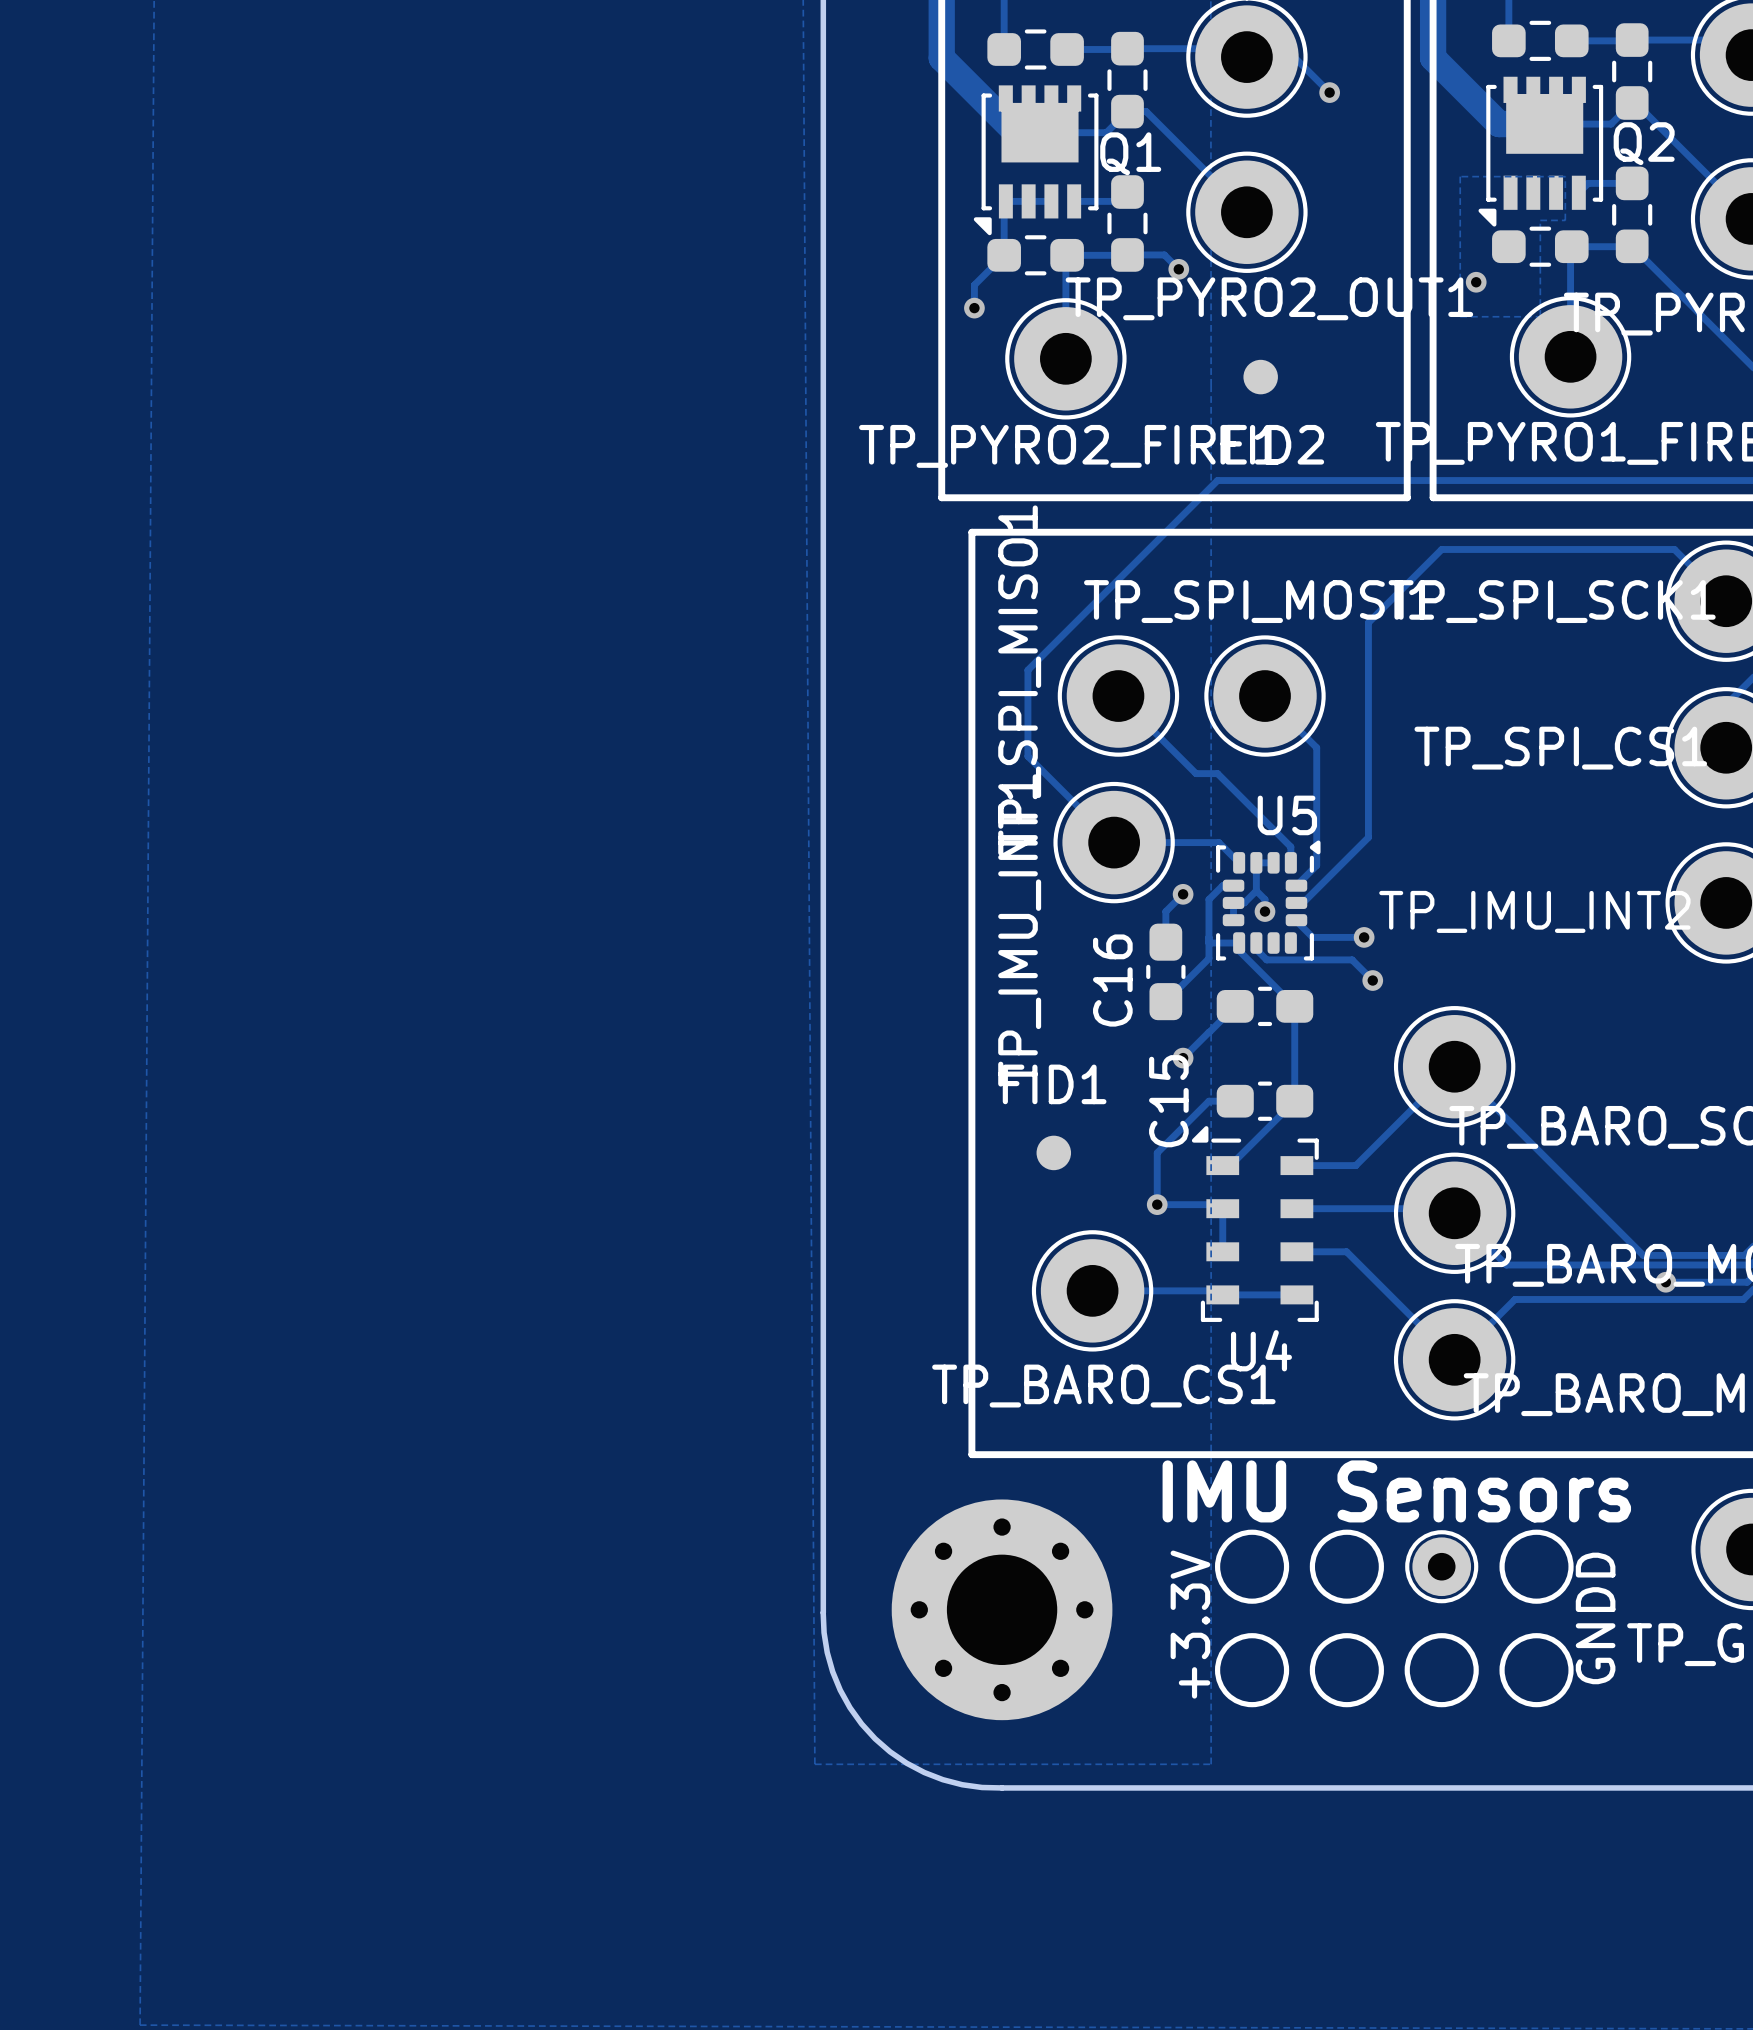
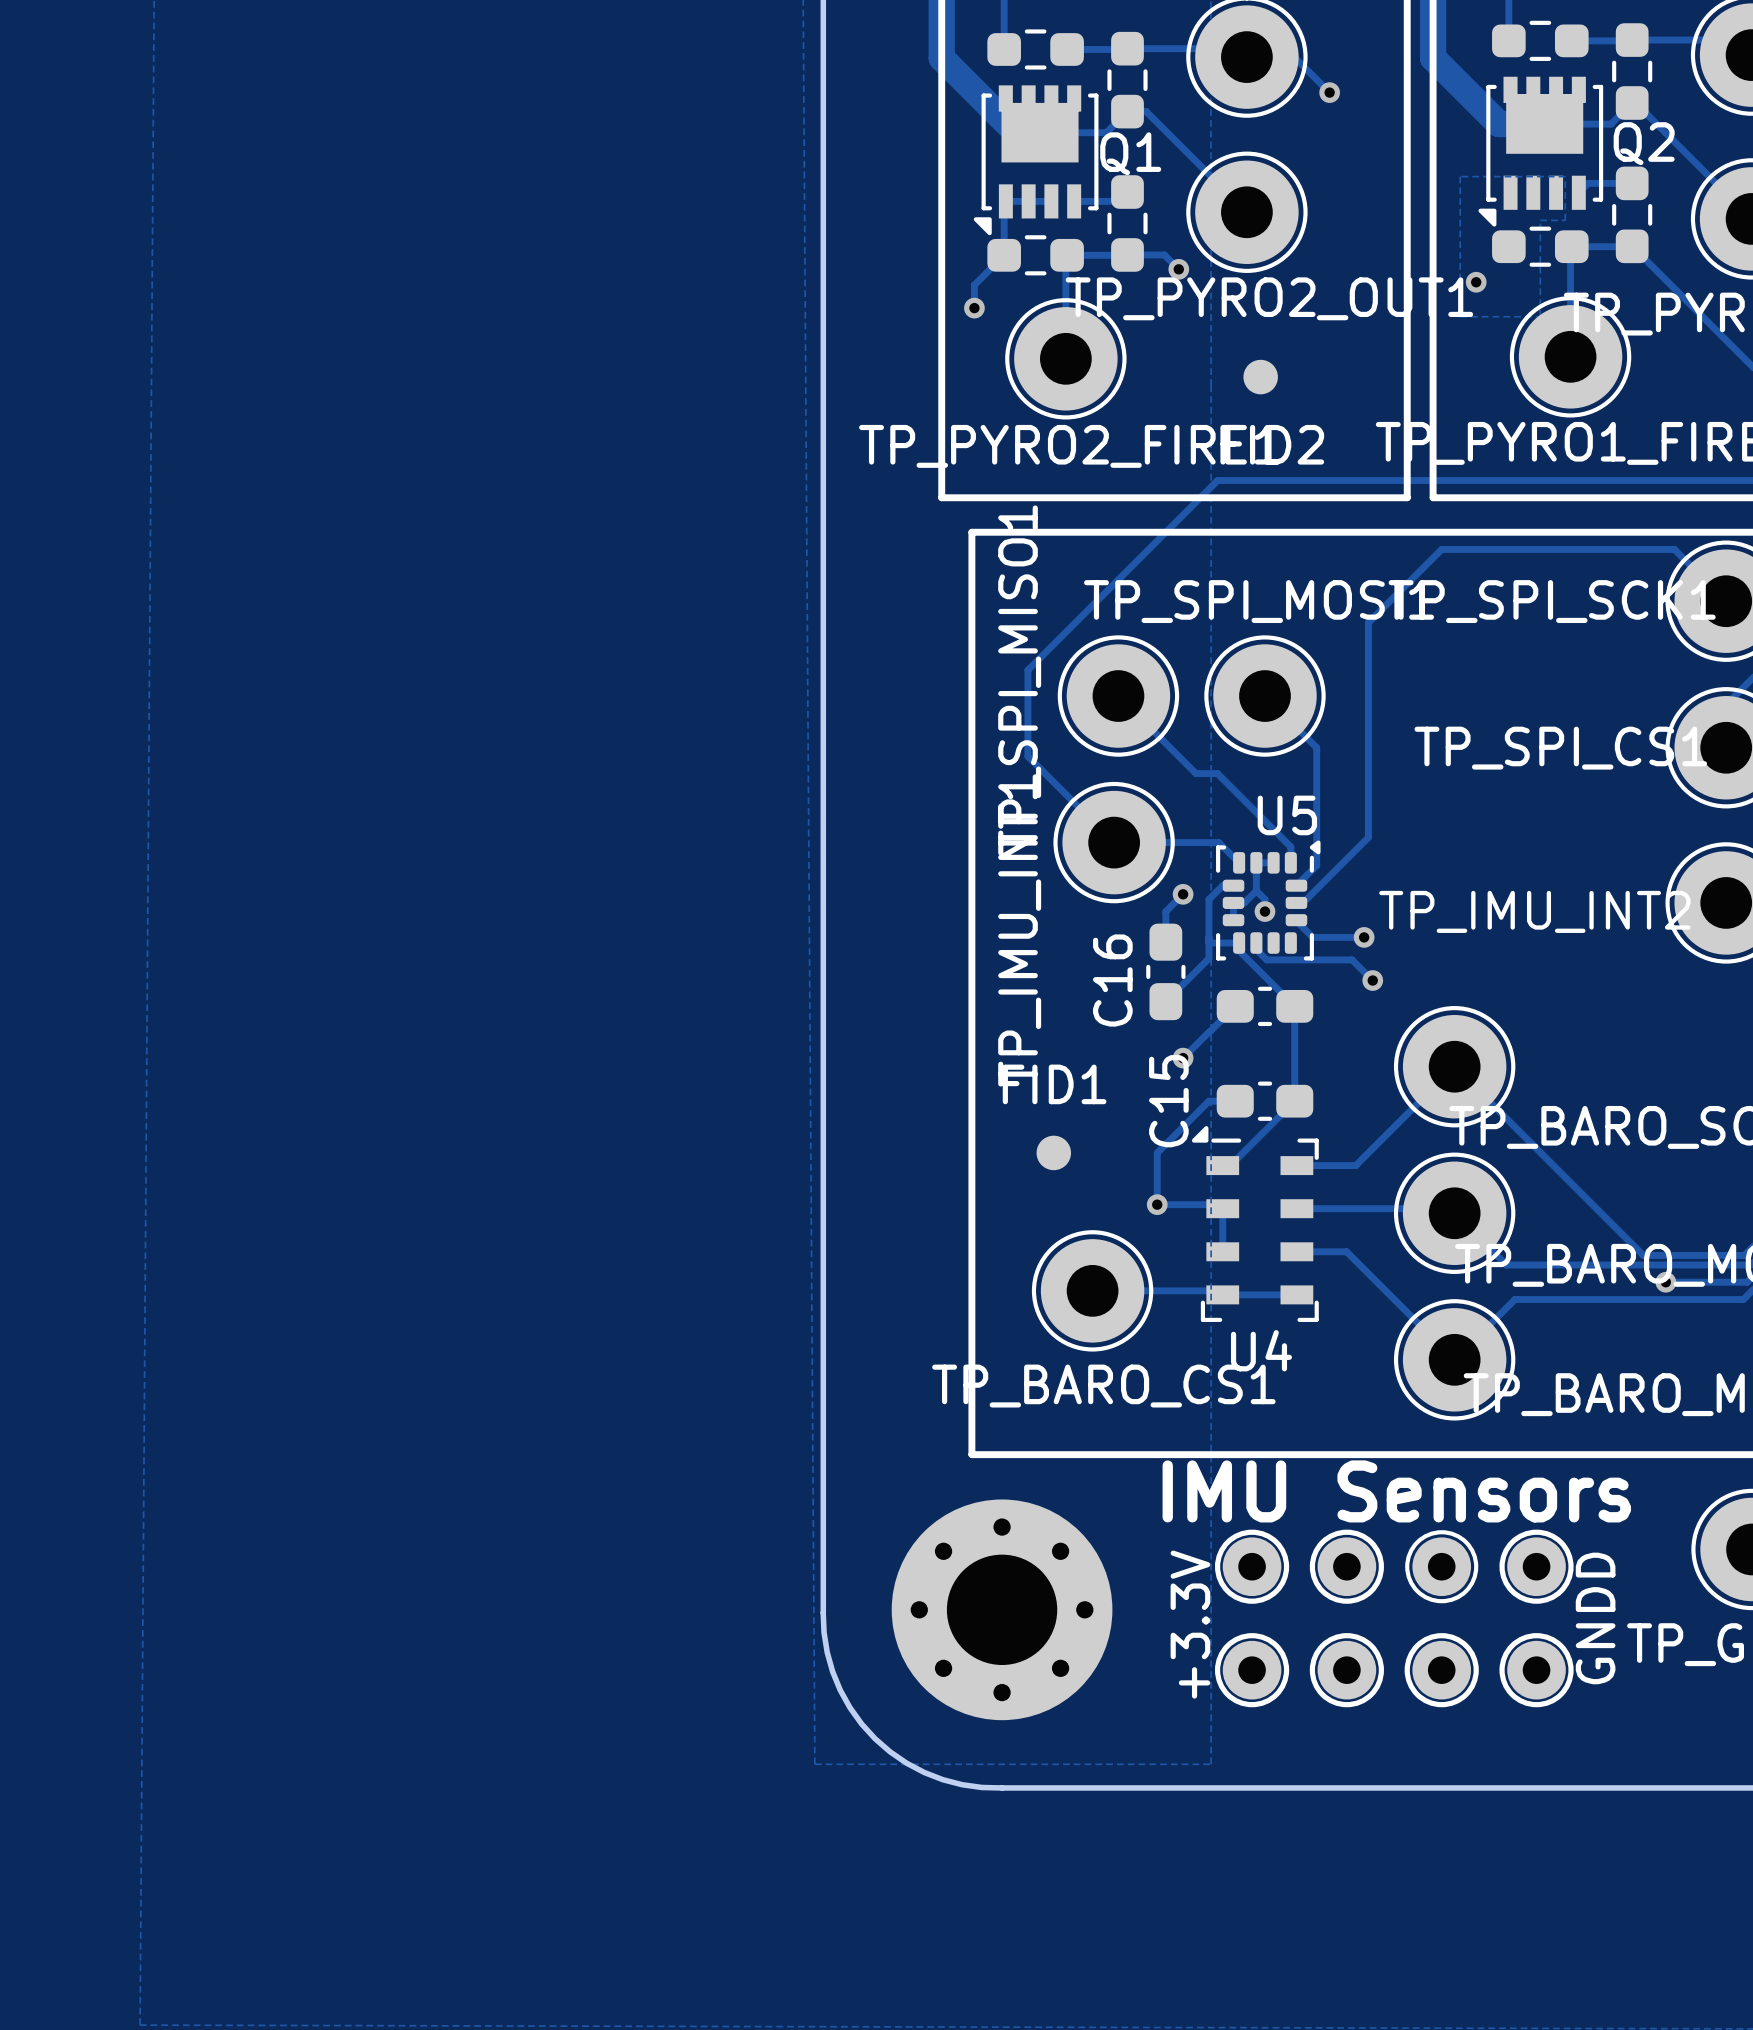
part: none -> (1252, 1566)
part: none -> (1346, 1566)
part: none -> (1536, 1566)
part: none -> (1252, 1670)
part: none -> (1346, 1670)
part: none -> (1441, 1670)
part: none -> (1536, 1670)

